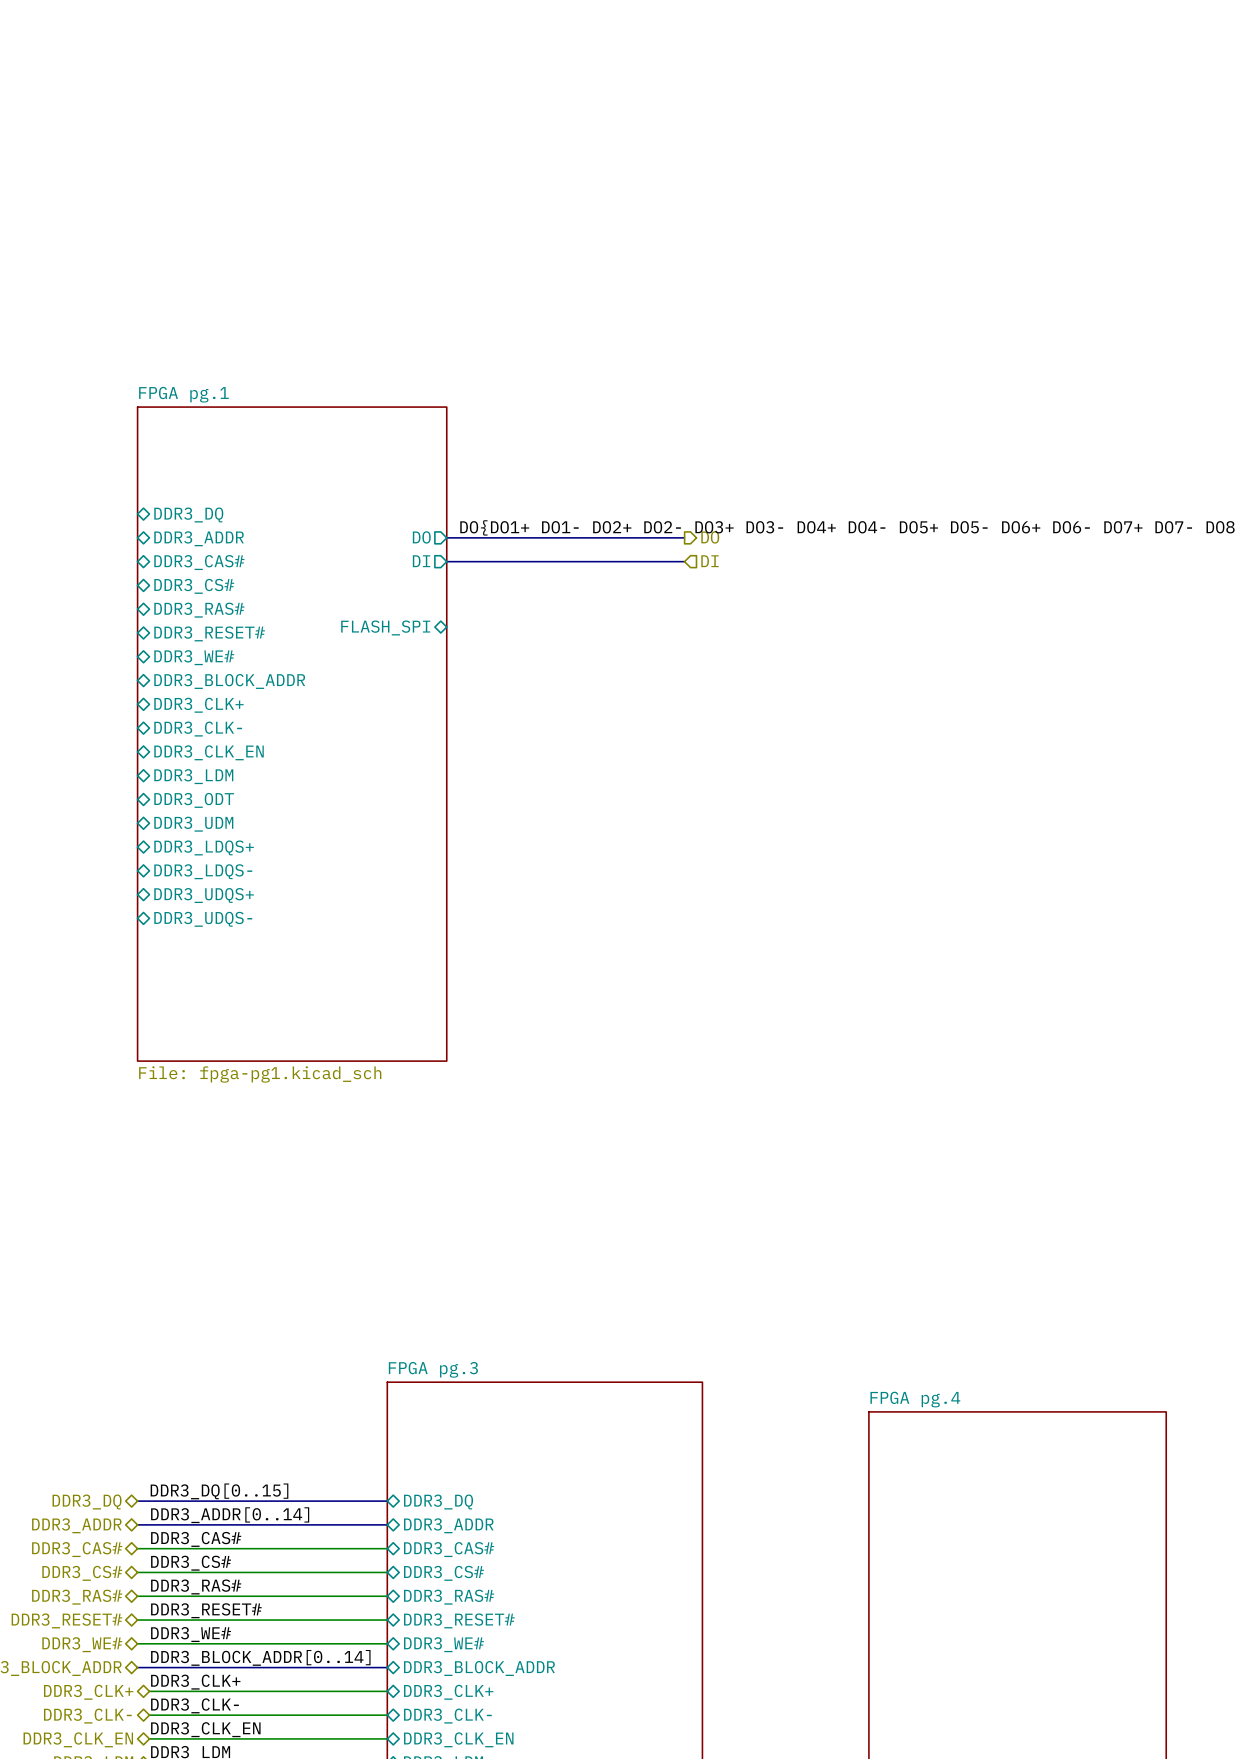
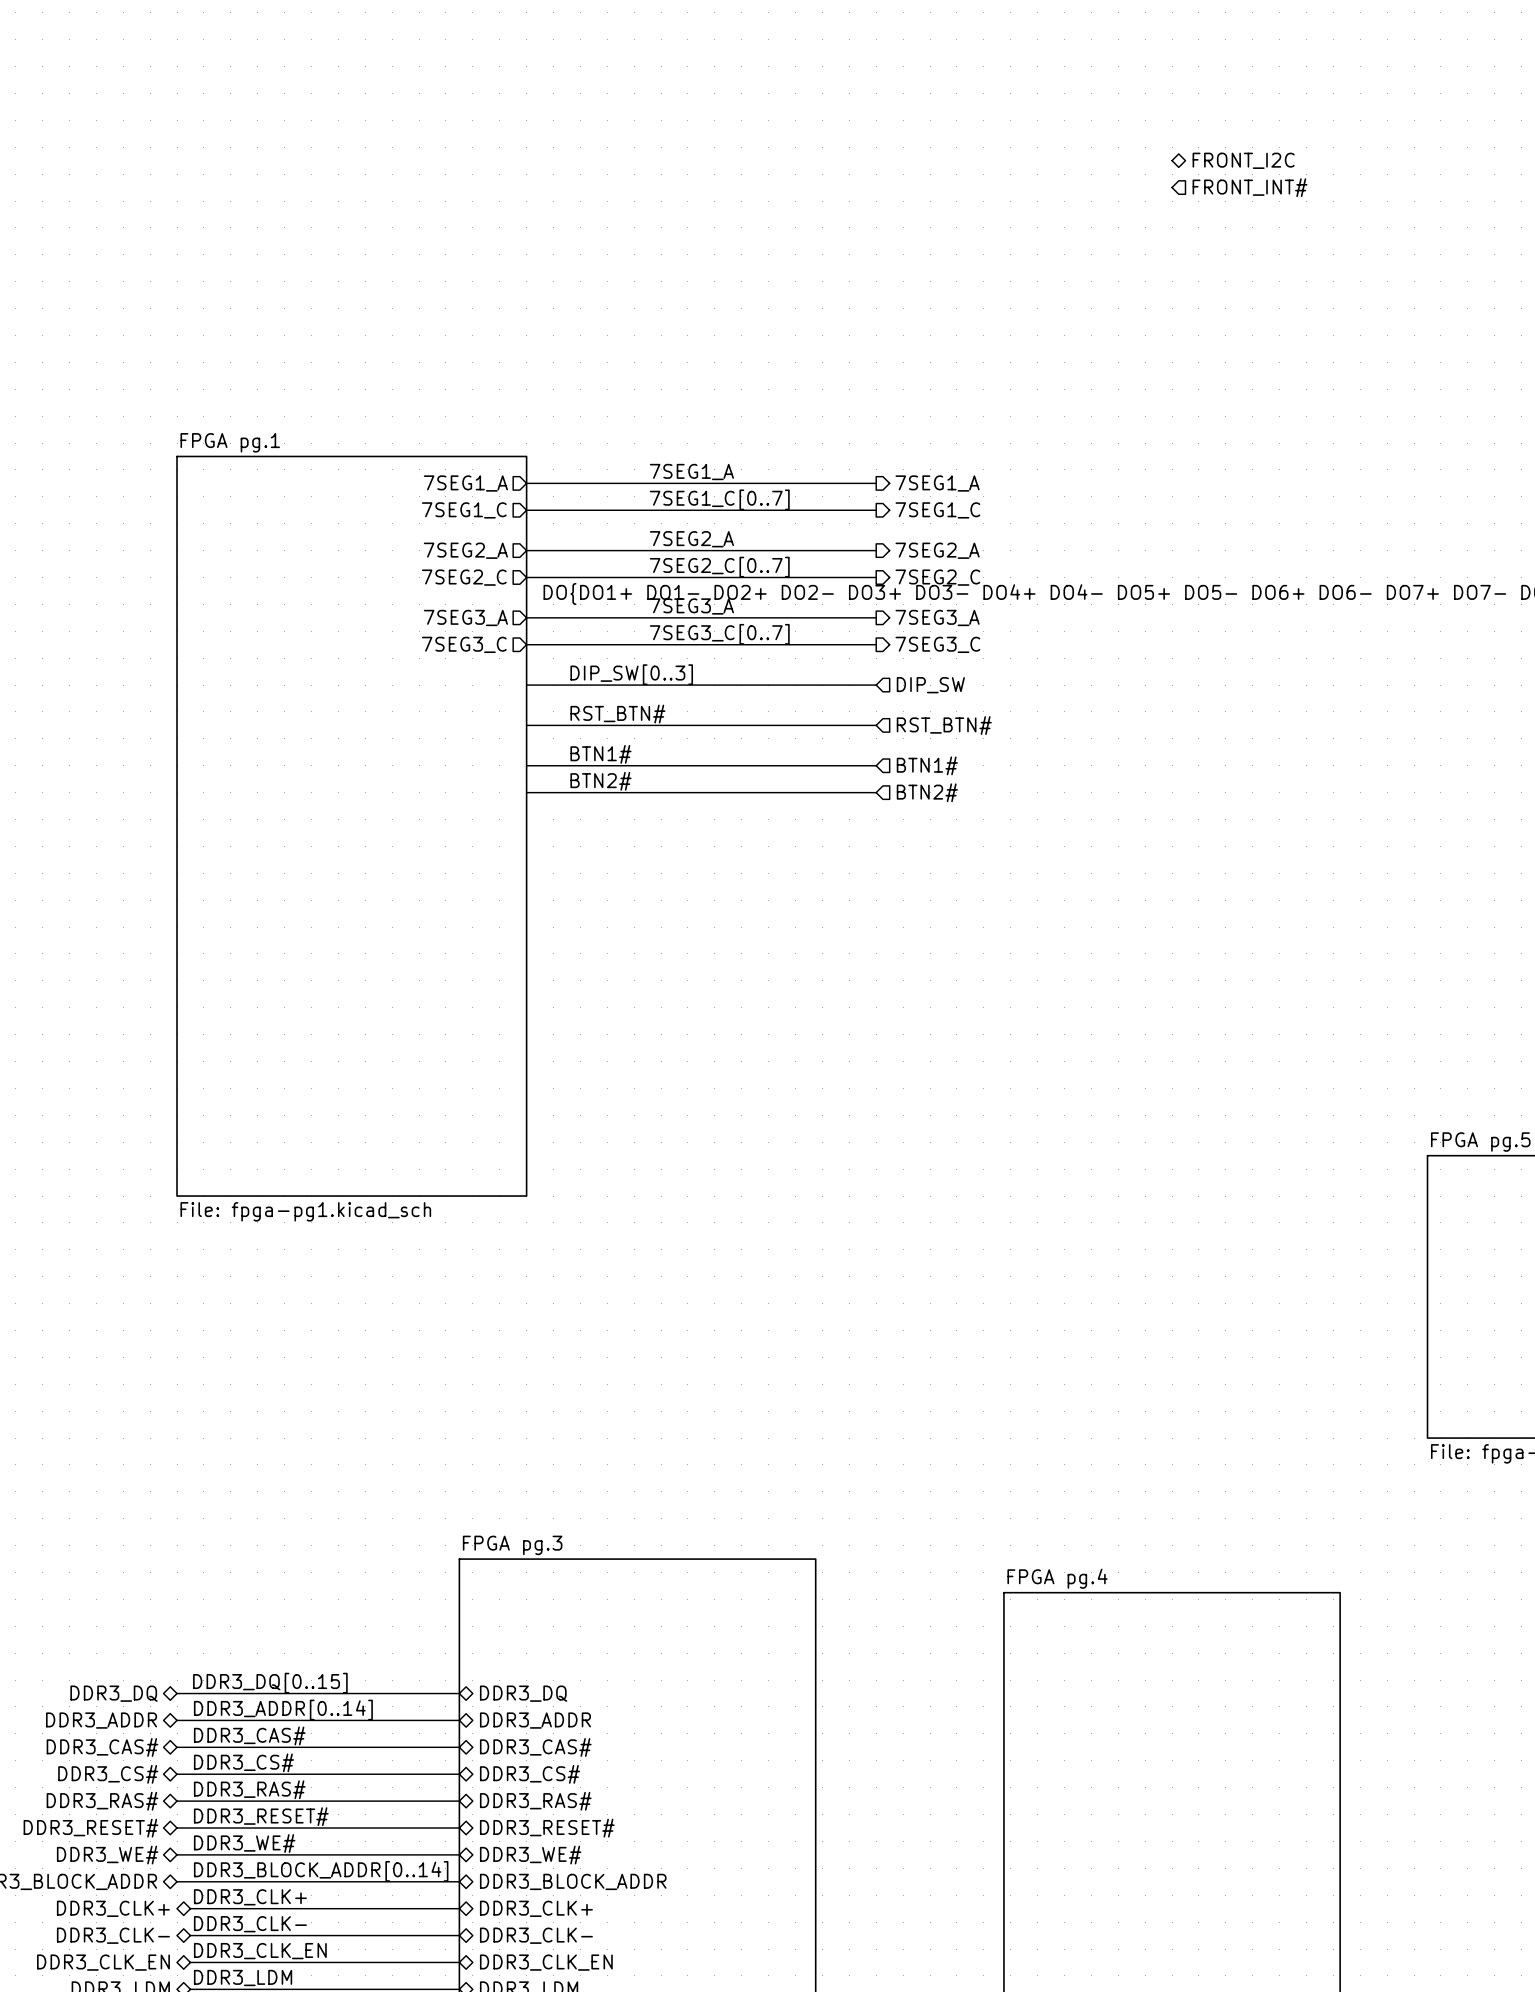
hierarchical label: none -> FRONT_I2C (1243, 160)
hierarchical label: none -> FRONT_INT# (1250, 187)
label: none -> 7SEG1_A (691, 472)
wire: none -> (526, 483) (876, 483)
sheet pin: none -> 7SEG1_A (465, 483)
hierarchical label: none -> 7SEG1_A (937, 483)
label: none -> 7SEG1_C[0..7] (719, 499)
bus: none -> (526, 510) (876, 510)
sheet pin: none -> 7SEG1_C (464, 510)
hierarchical label: none -> 7SEG1_C (937, 510)
label: none -> 7SEG2_A (691, 539)
wire: none -> (526, 550) (876, 550)
sheet pin: none -> 7SEG2_A (465, 550)
hierarchical label: none -> 7SEG2_A (937, 550)
label: none -> 7SEG2_C[0..7] (719, 567)
sheet pin: DDR3_DQ (188, 514) -> none
sheet pin: none -> 7SEG2_C (464, 577)
bus: none -> (526, 577) (876, 577)
hierarchical label: none -> 7SEG2_C (937, 577)
sheet pin: DO (421, 537) -> none
bus: (446, 537) (684, 537) -> none
hierarchical label: DO (710, 537) -> none
sheet pin: DDR3_ADDR (199, 538) -> none
label: none -> 7SEG3_A (691, 606)
wire: none -> (526, 617) (876, 617)
sheet pin: none -> 7SEG3_A (465, 617)
hierarchical label: none -> 7SEG3_A (937, 617)
sheet pin: DI (421, 561) -> none
bus: (446, 561) (684, 561) -> none
hierarchical label: DI (710, 561) -> none
sheet pin: DDR3_CAS# (199, 562) -> none
label: none -> 7SEG3_C[0..7] (719, 634)
bus: none -> (526, 644) (876, 644)
sheet pin: none -> 7SEG3_C (464, 644)
hierarchical label: none -> 7SEG3_C (937, 644)
sheet pin: DDR3_CS# (194, 586) -> none
label: none -> DIP_SW[0..3] (631, 674)
bus: none -> (526, 685) (876, 685)
sheet pin: DDR3_RAS# (199, 610) -> none
hierarchical label: none -> DIP_SW (930, 685)
sheet pin: FLASH_SPI (385, 627) -> none
sheet pin: DDR3_RESET# (209, 633) -> none
label: none -> RST_BTN# (617, 714)
wire: none -> (526, 725) (876, 725)
hierarchical label: none -> RST_BTN# (944, 725)
sheet pin: DDR3_WE# (194, 657) -> none
label: none -> BTN1# (600, 754)
wire: none -> (526, 765) (876, 765)
hierarchical label: none -> BTN1# (927, 765)
sheet pin: DDR3_BLOCK_ADDR (229, 681) -> none
label: none -> BTN2# (600, 781)
hierarchical label: none -> BTN2# (927, 792)
wire: none -> (526, 792) (876, 792)
sheet pin: DDR3_CLK+ (198, 705) -> none
sheet pin: DDR3_CLK- (198, 729) -> none
sheet pin: DDR3_CLK_EN (209, 752) -> none
sheet pin: DDR3_LDM (193, 776) -> none
sheet pin: DDR3_ODT (194, 800) -> none
sheet pin: DDR3_UDM (193, 824) -> none
sheet pin: DDR3_LDQS+ (204, 847) -> none
sheet pin: DDR3_LDQS- (203, 871) -> none
sheet pin: DDR3_UDQS+ (204, 895) -> none
sheet pin: DDR3_UDQS- (203, 919) -> none

